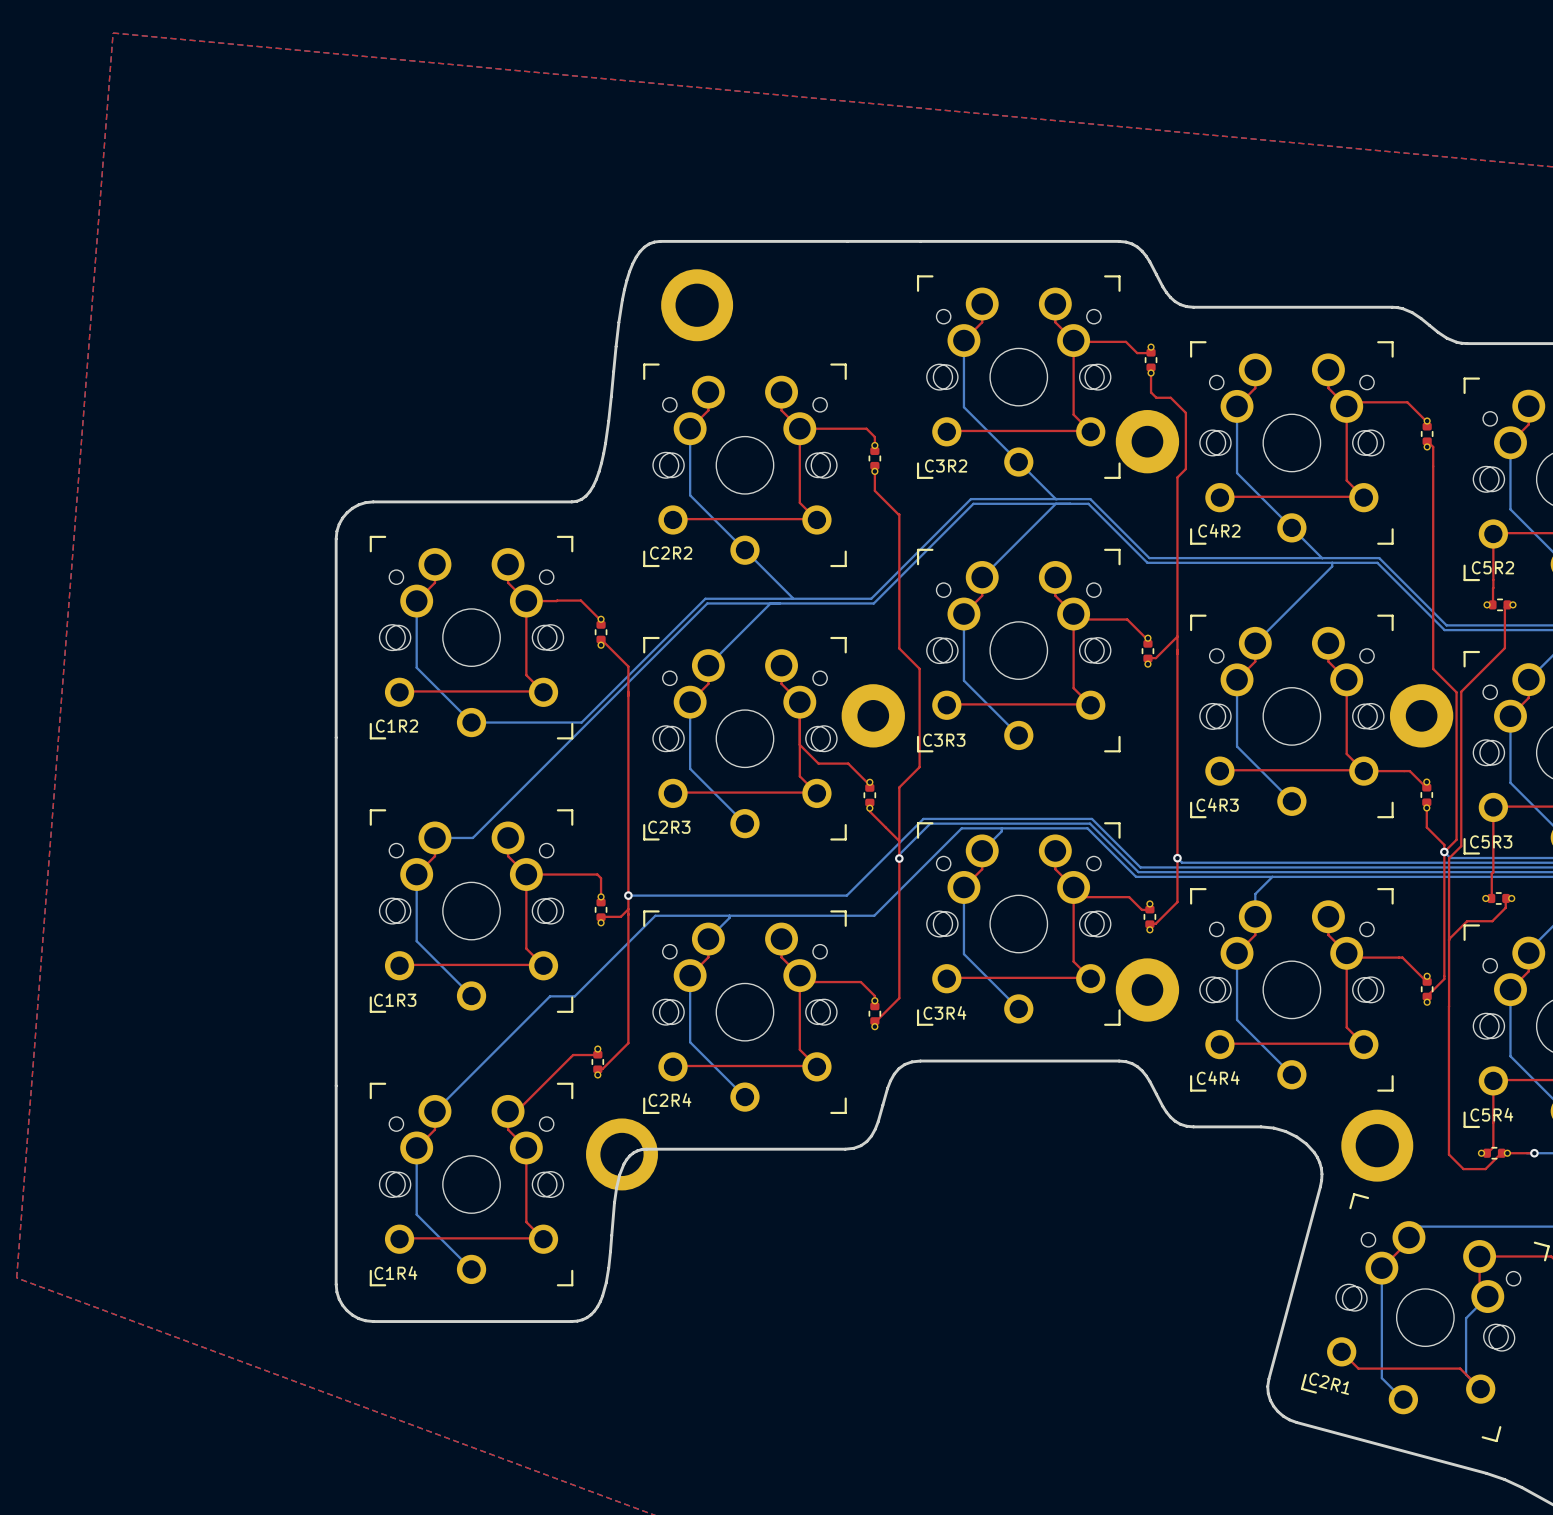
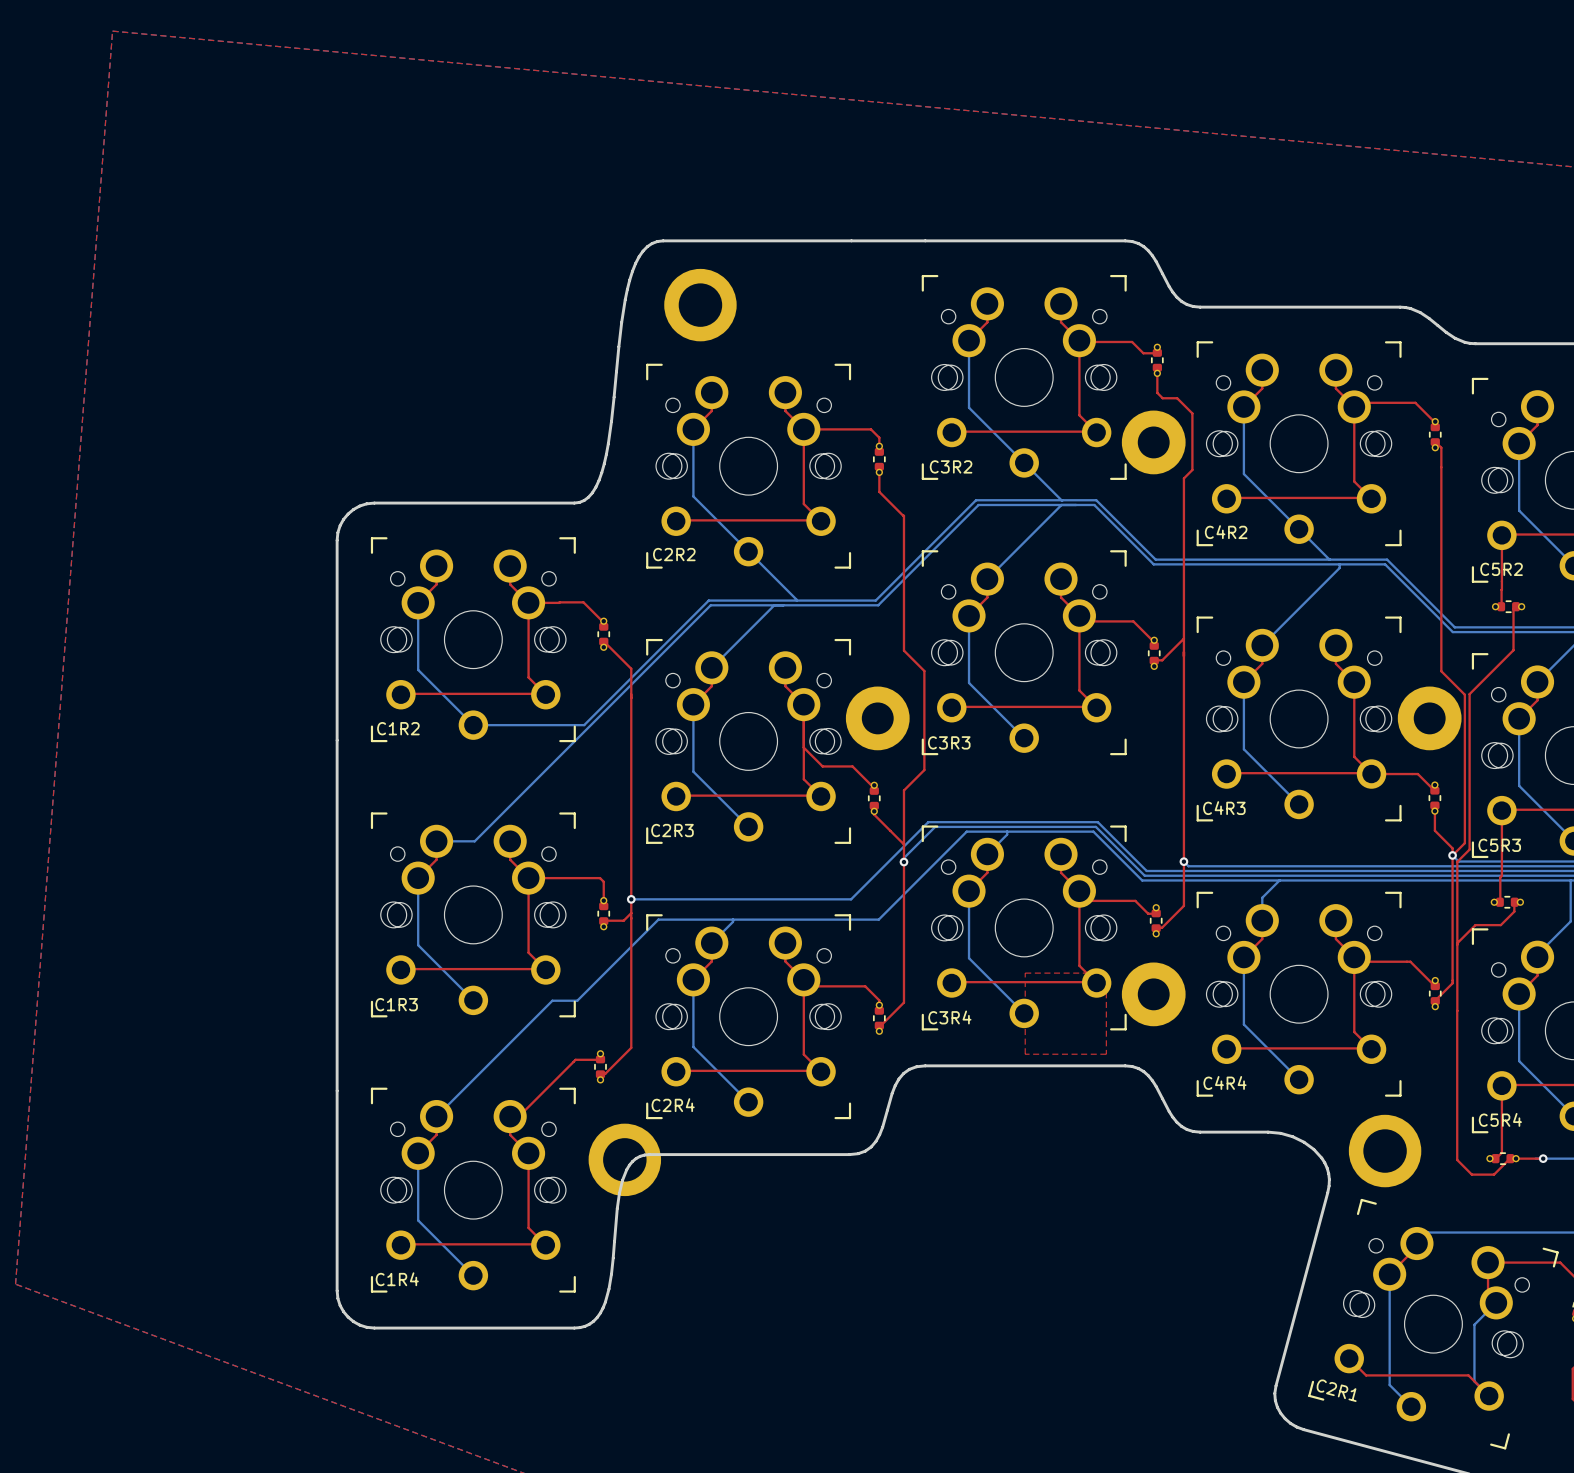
top zone outline: none -> (1025, 973) (1025, 1054) (1106, 1054) (1106, 973) (1025, 973)

